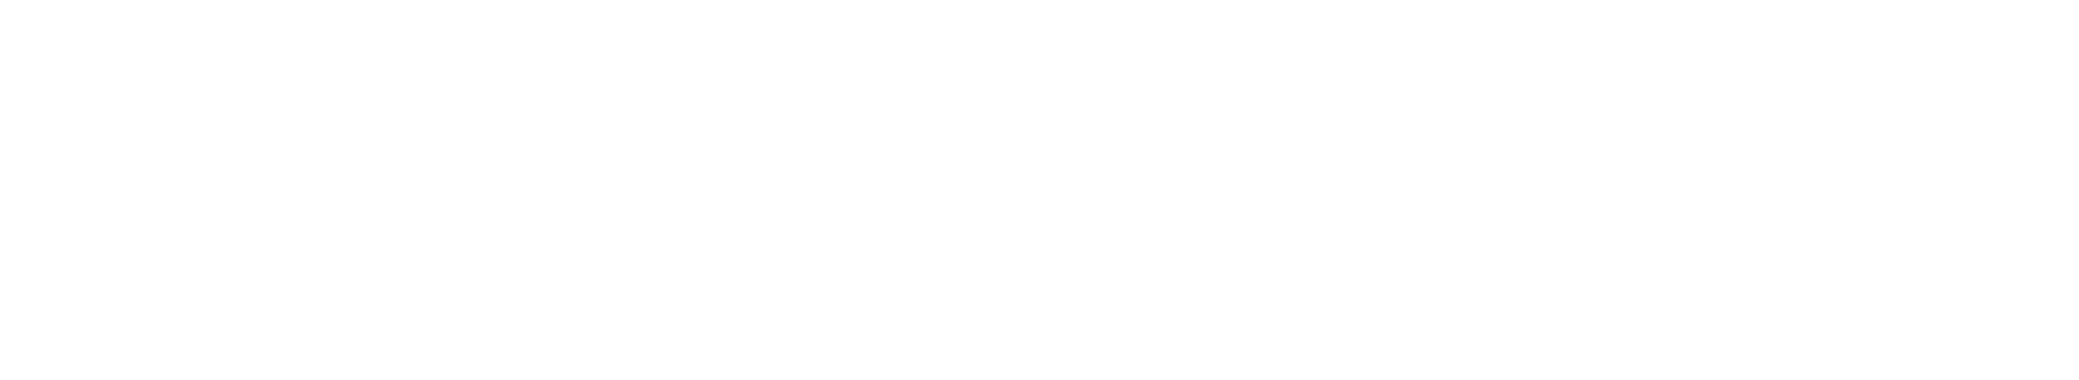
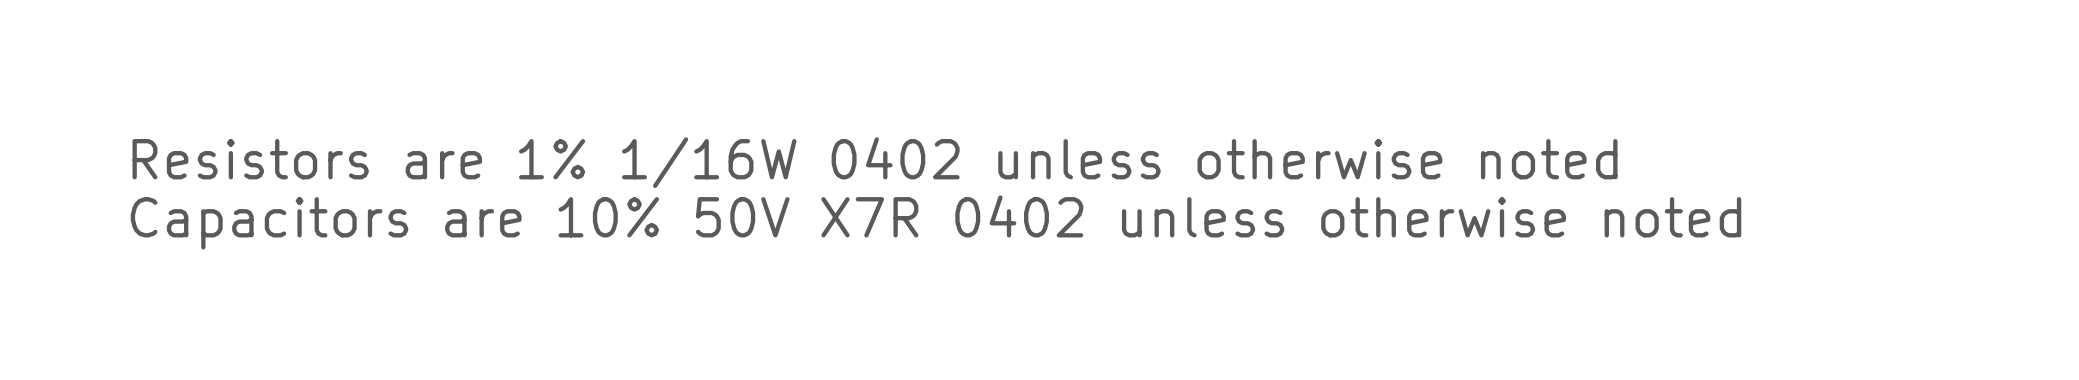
text: none -> Resistors are 1% 1/16W 0402 unless otherwise noted (875, 162)
text: none -> Capacitors are 10% 50V X7R 0402 unless otherwise noted (935, 222)

